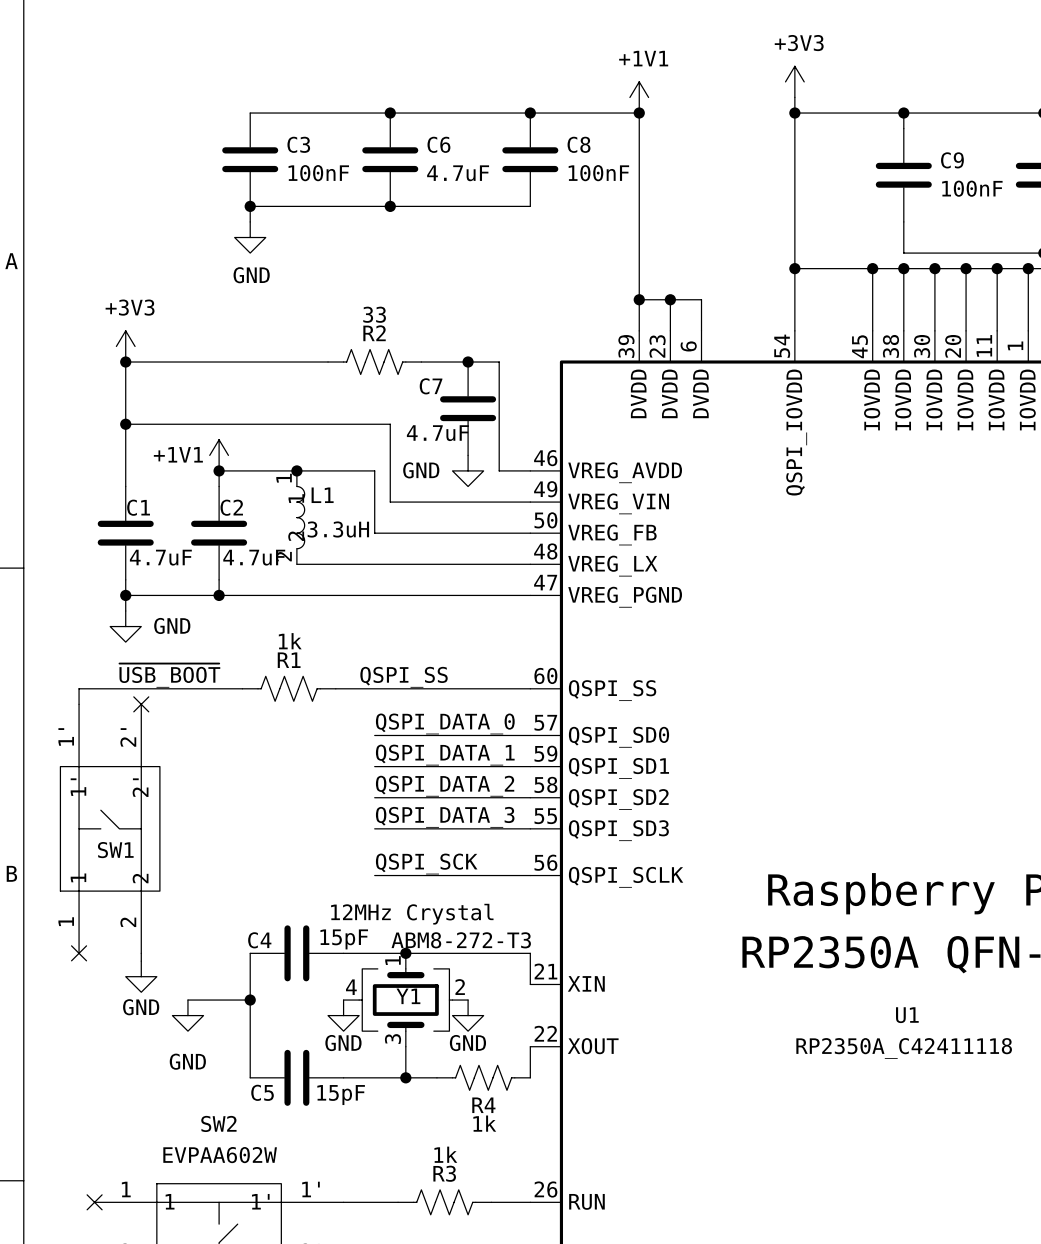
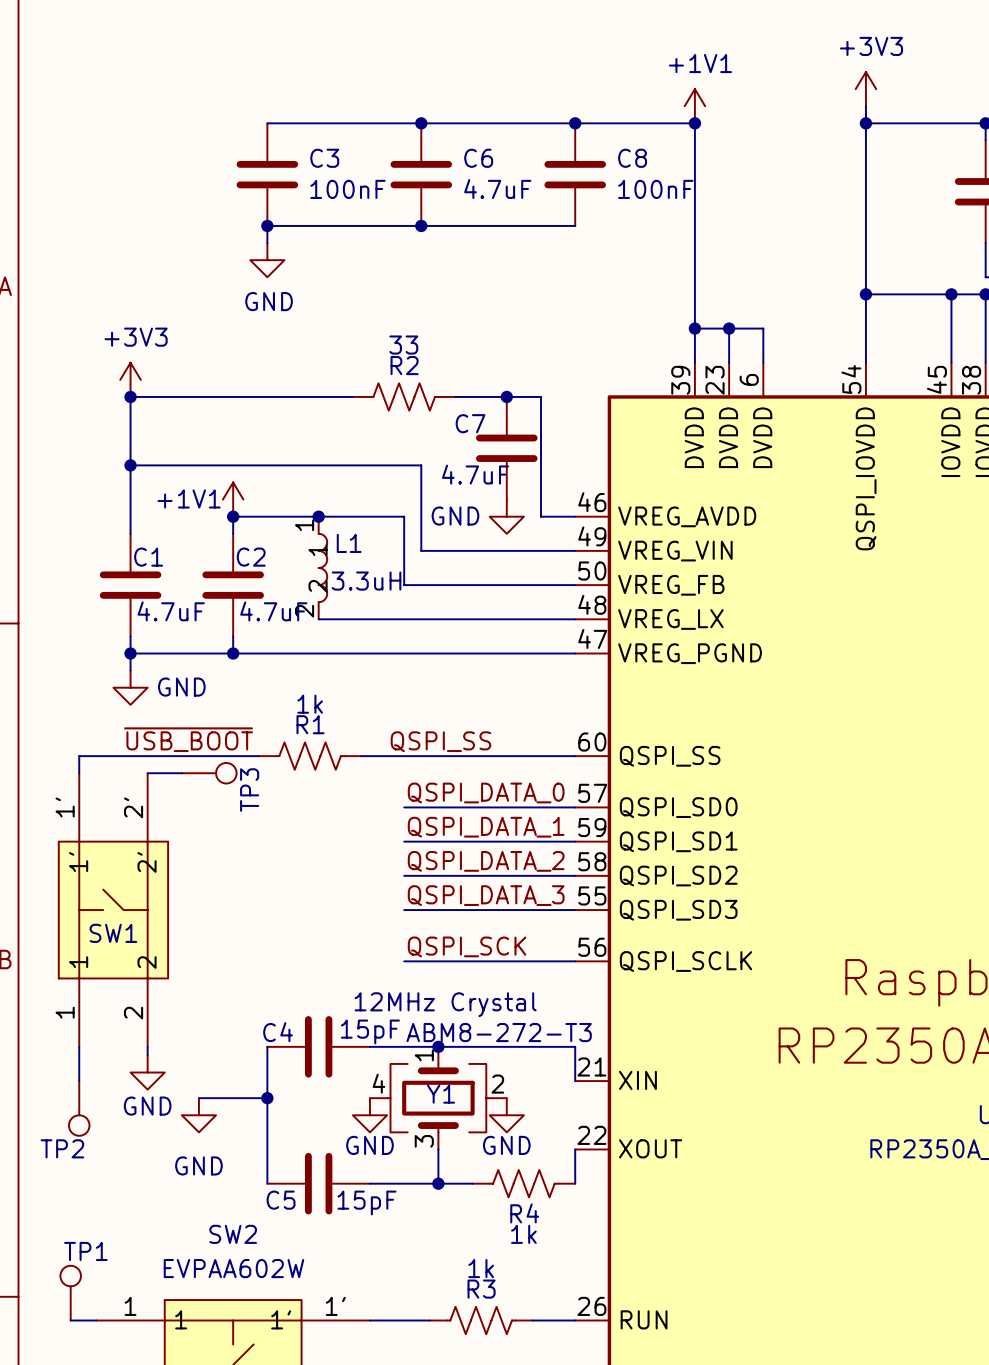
wire: none -> (147, 773) (181, 773)
no-connect mark: (141, 704) -> none
TP3: none -> (209, 773)
wire: none -> (79, 1046) (79, 1081)
no-connect mark: (79, 953) -> none
TP2: none -> (79, 1108)
TP1: none -> (70, 1293)
wire: none -> (70, 1320) (96, 1320)
no-connect mark: (94, 1202) -> none

